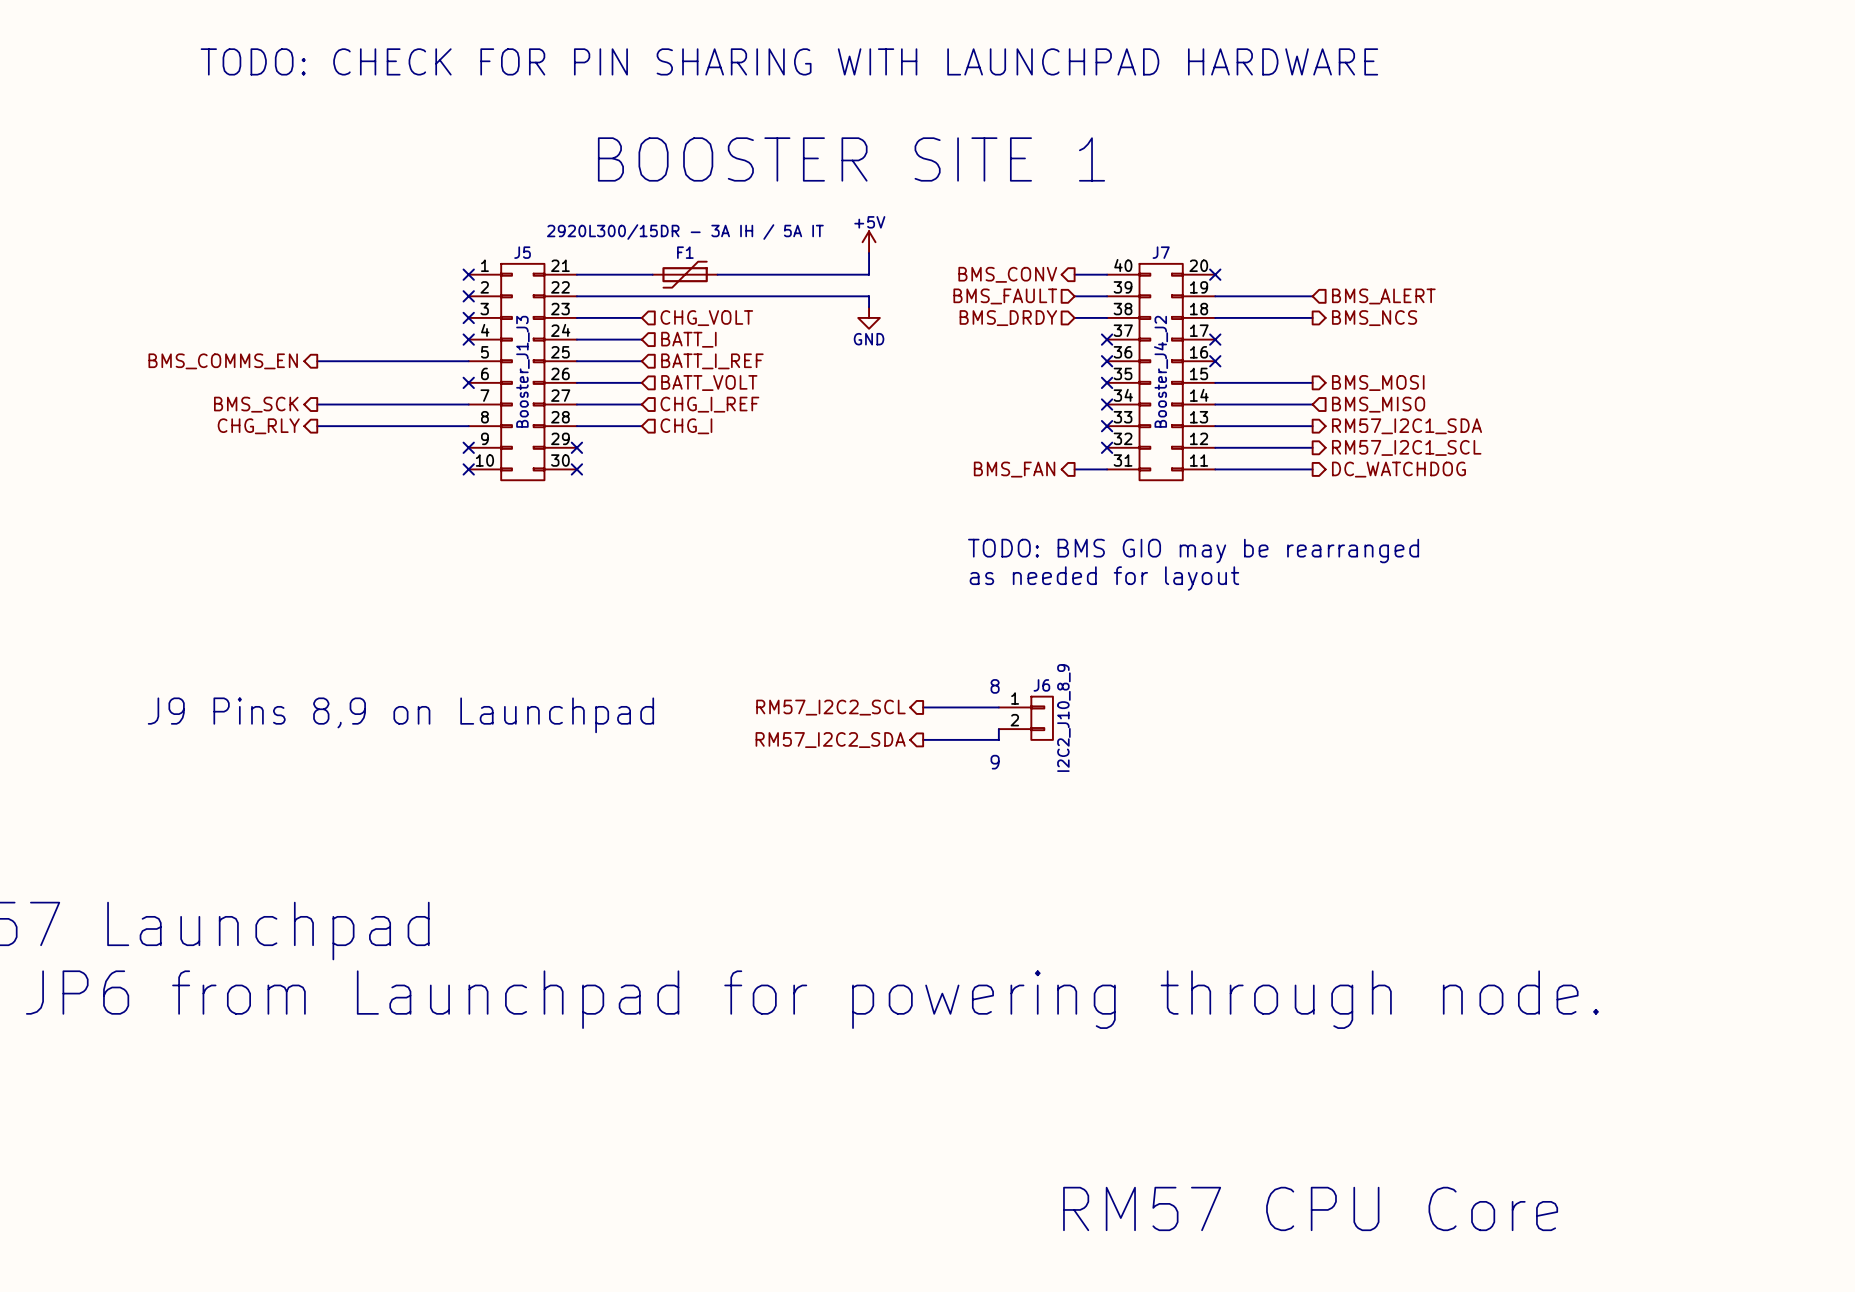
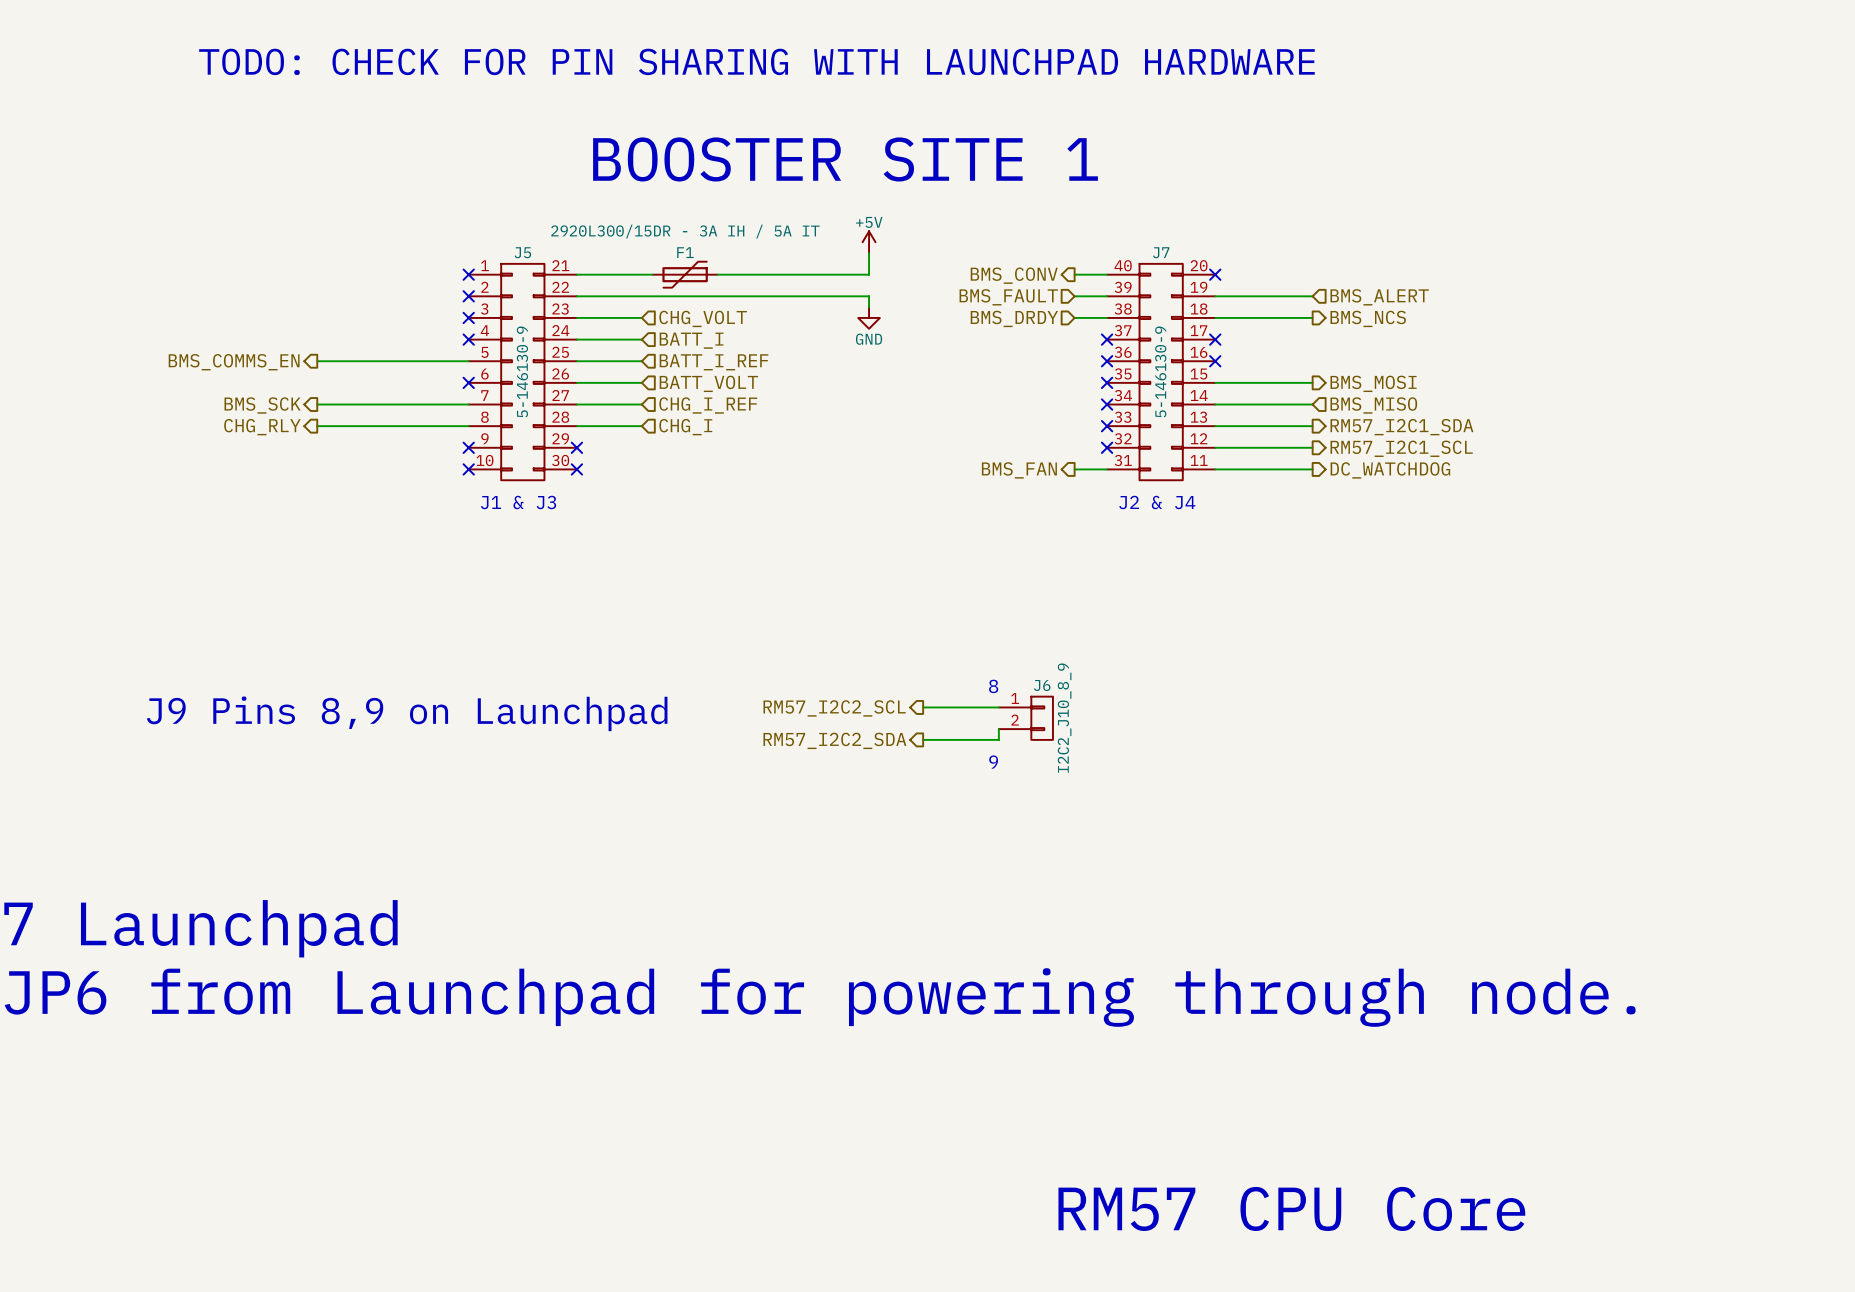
J5 value: Booster_J1_J3 (522, 371) -> 5-146130-9 (522, 371)
J7 value: Booster_J4_J2 (1161, 371) -> 5-146130-9 (1160, 371)
text: none -> J1 & J3 (518, 502)
text: none -> J2 & J4 (1157, 502)
text: TODO: BMS GIO may be rearranged (1193, 551) -> none
text: as needed for layout (1104, 578) -> none

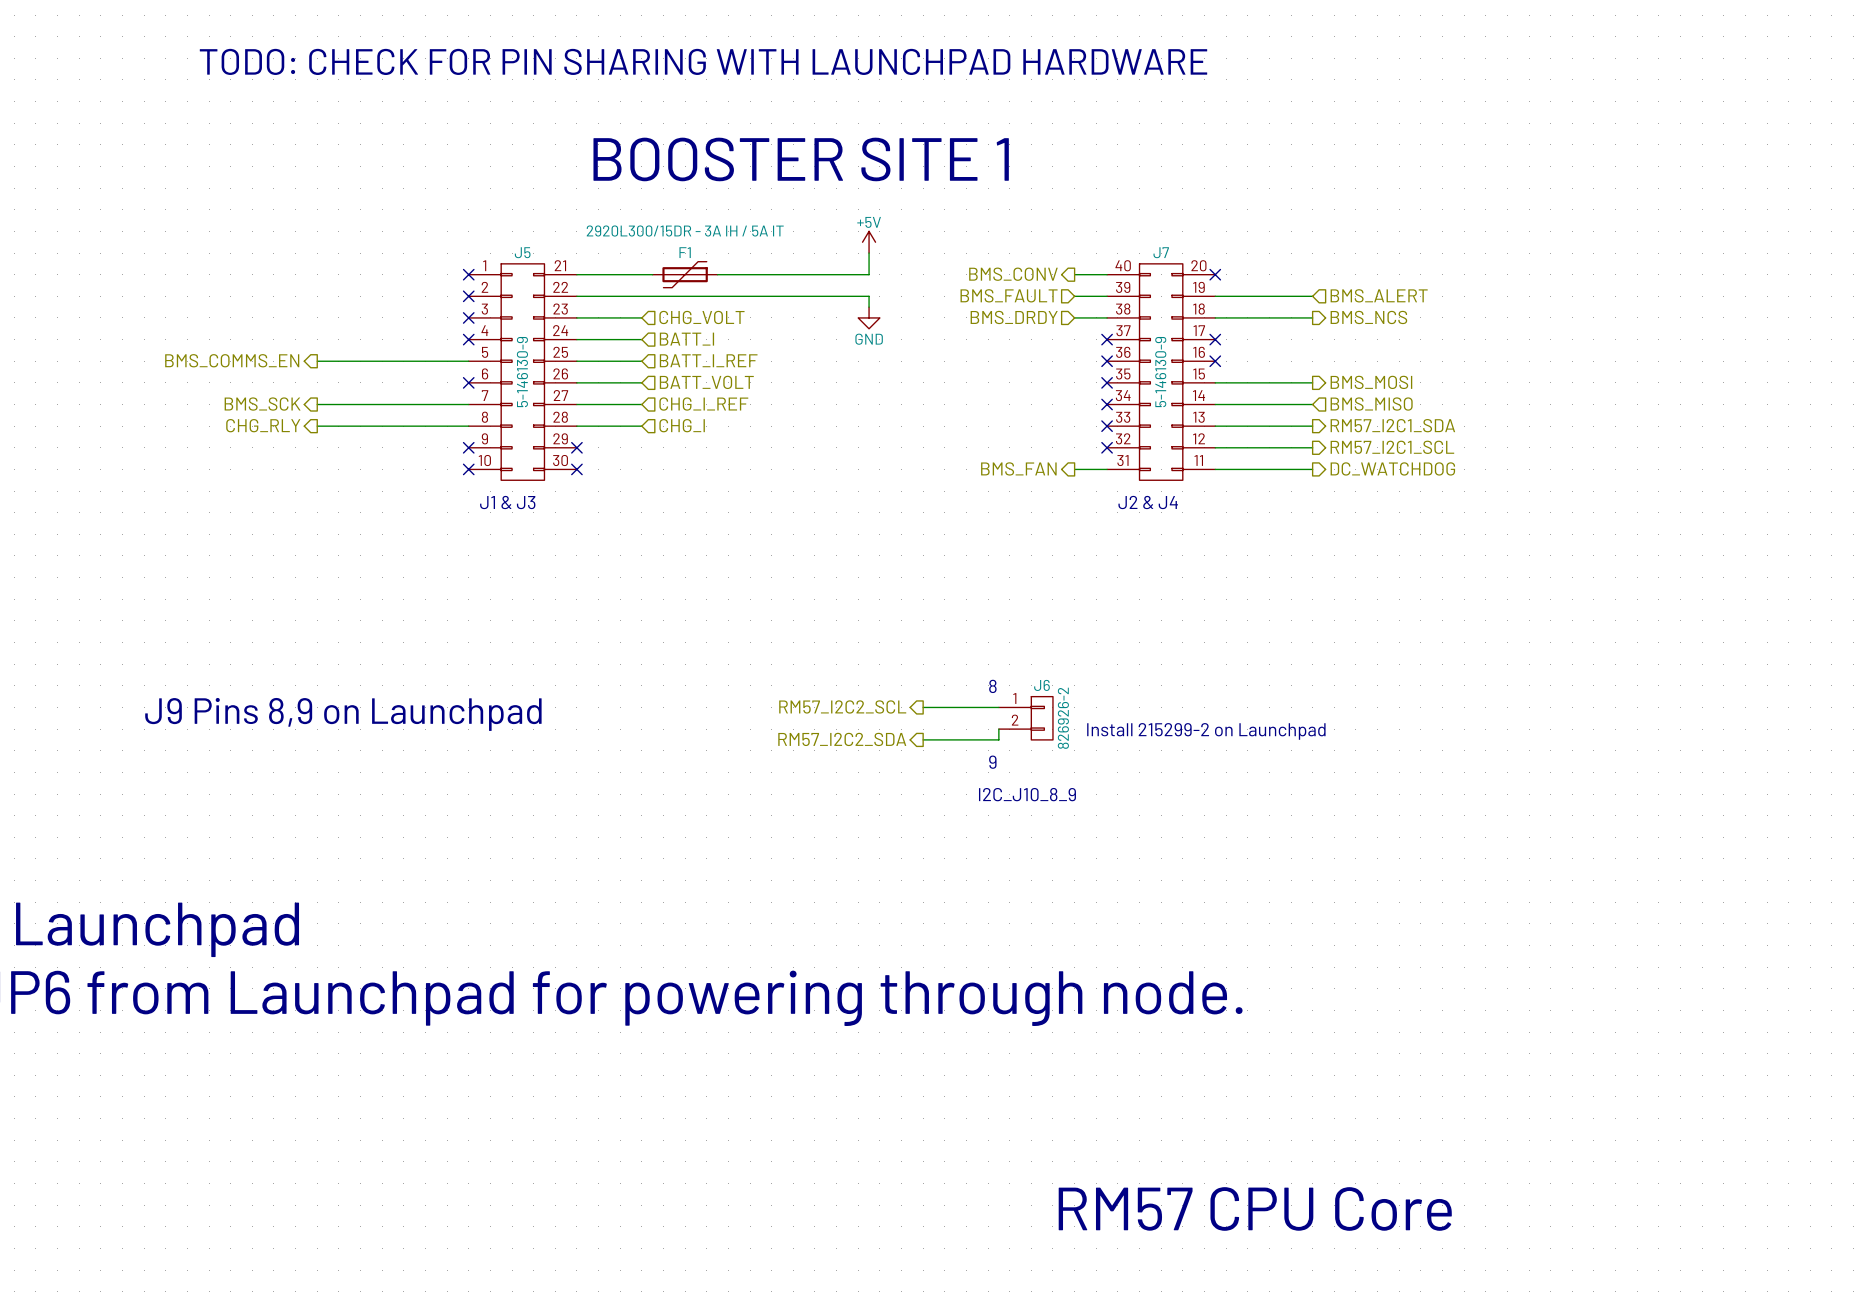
J6 value: I2C2_J10_8_9 (1064, 718) -> 826926-2 (1063, 718)
text: none -> Install 215299-2 on Launchpad (1206, 731)
text: none -> I2C_J10_8_9 (1027, 794)

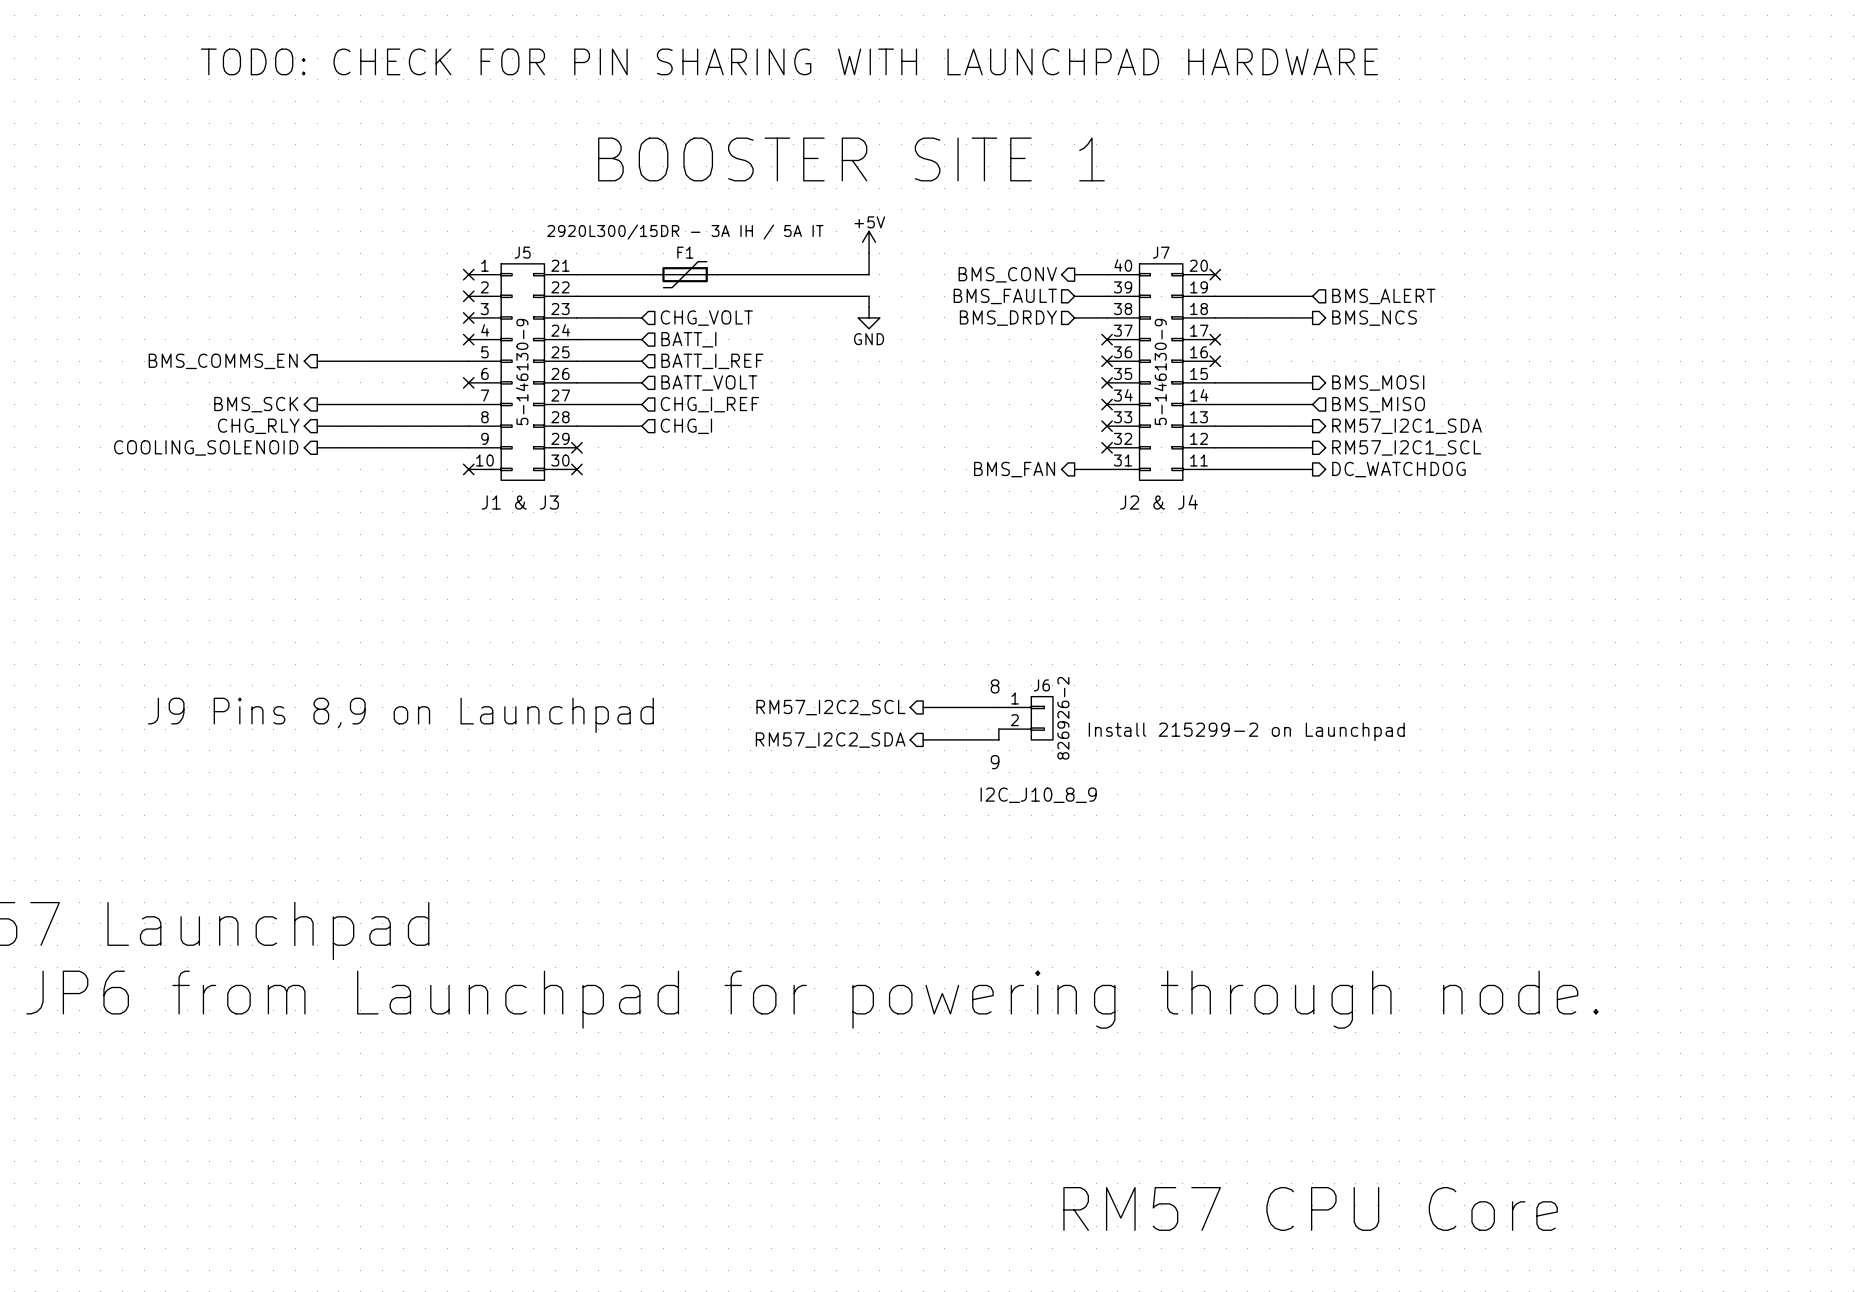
hierarchical label: none -> COOLING_SOLENOID (206, 447)
wire: none -> (317, 447) (468, 447)
no-connect mark: (468, 447) -> none

